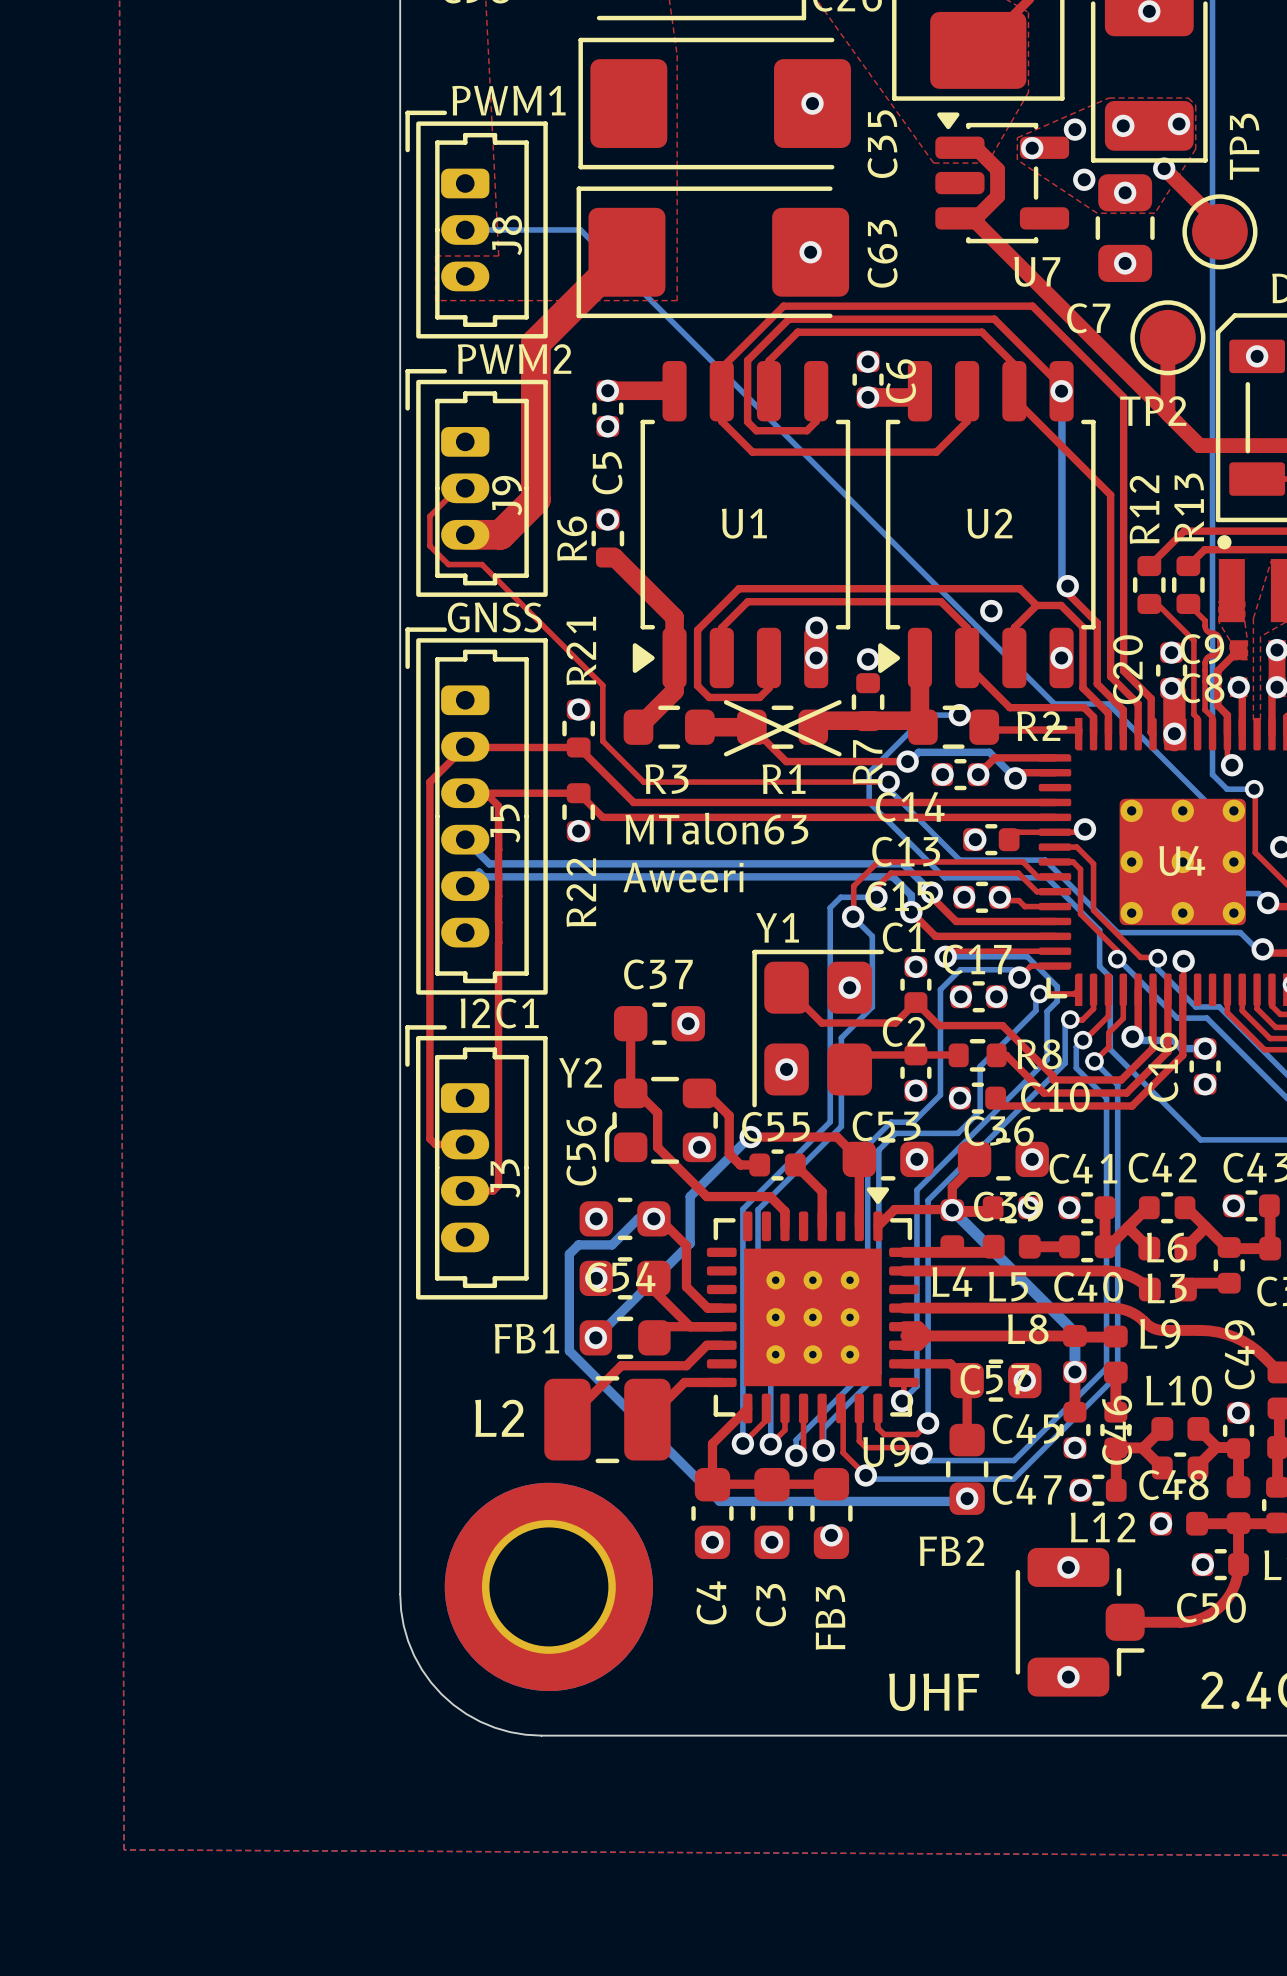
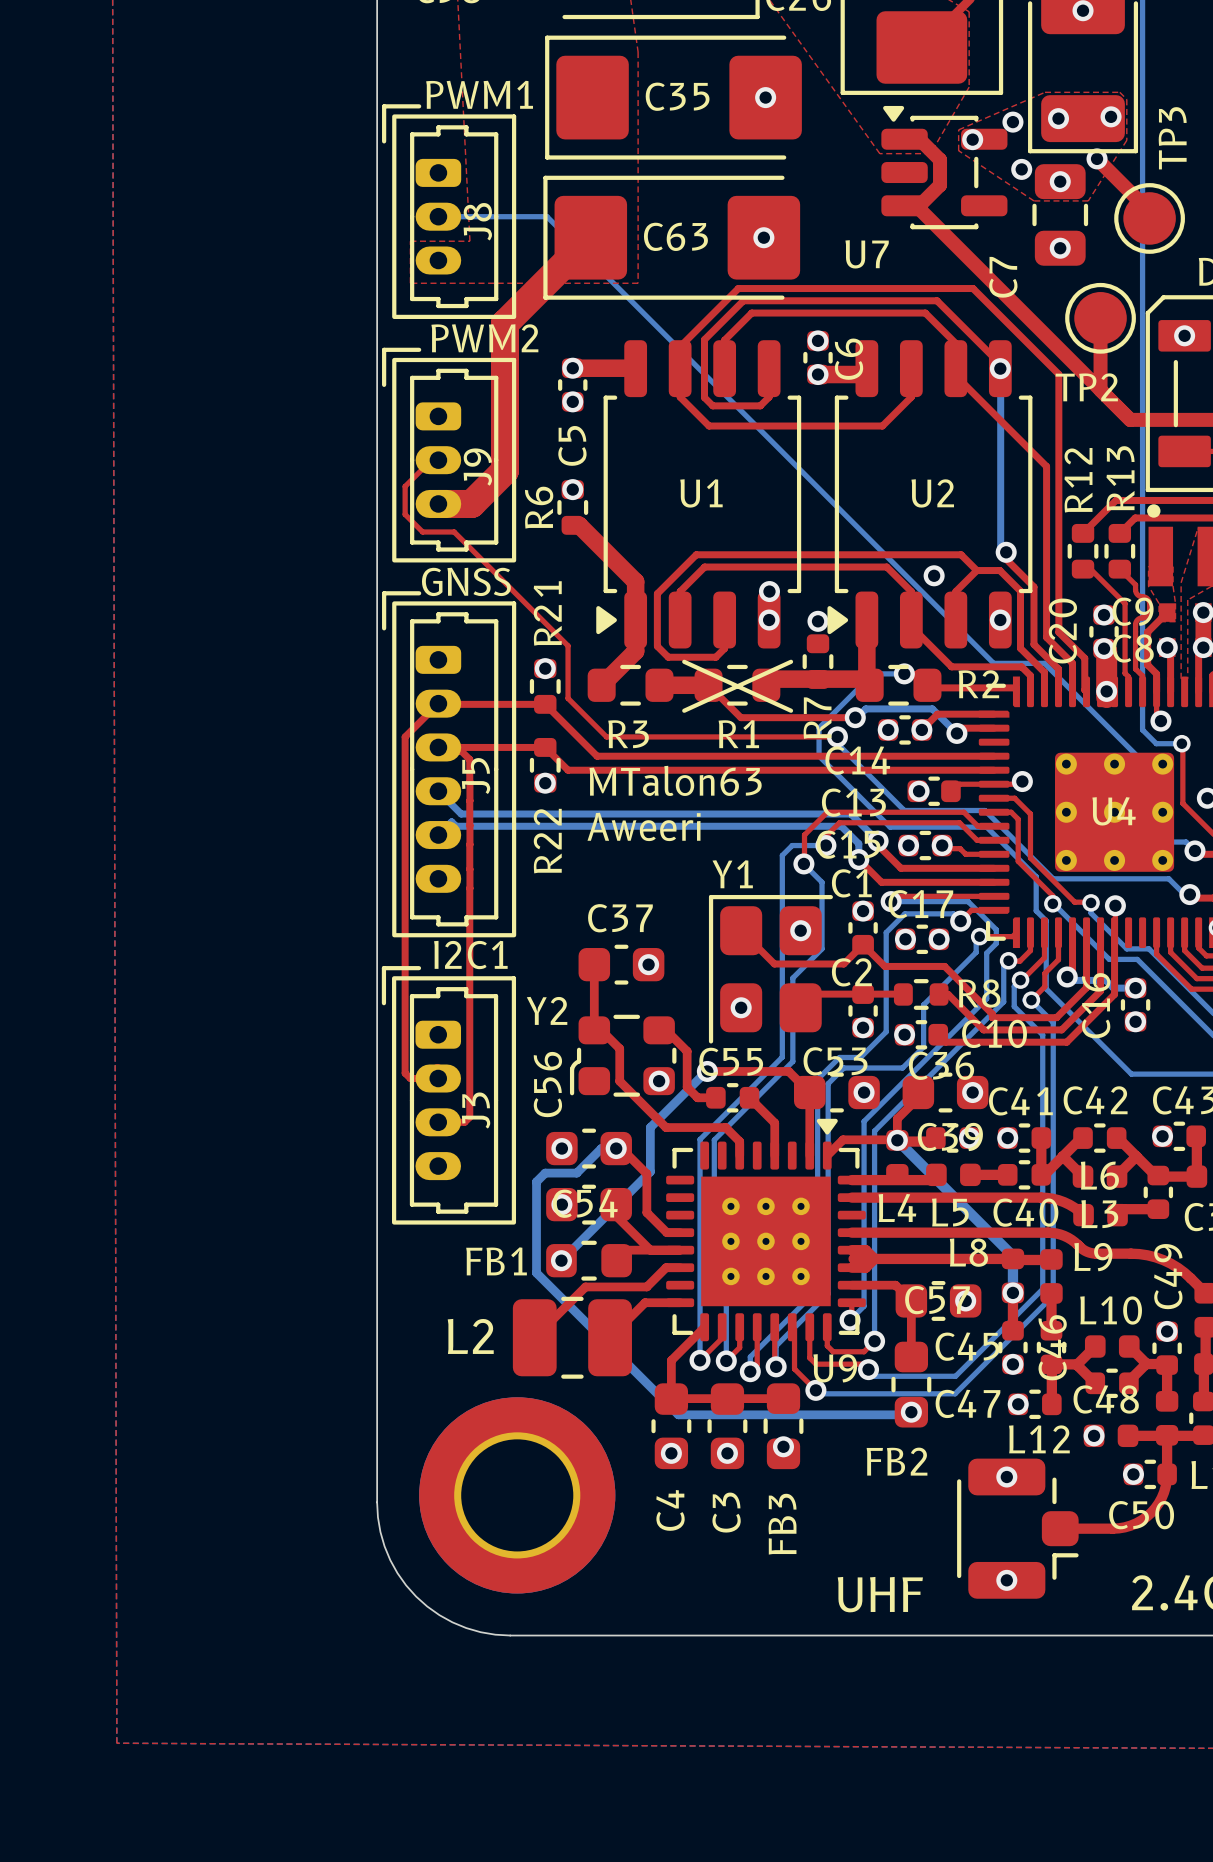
C35 name rotation: 0° (882, 144) -> 90° clockwise (677, 96)
C35 name position: C35 (882, 144) -> C35 (677, 96)
C63 name rotation: 0° (882, 253) -> 90° clockwise (675, 236)
C63 name position: C63 (882, 253) -> C63 (675, 236)
U7 name position: U7 (1037, 271) -> U7 (867, 254)
C7 name rotation: 0° (1088, 318) -> 90° counterclockwise (1003, 277)

